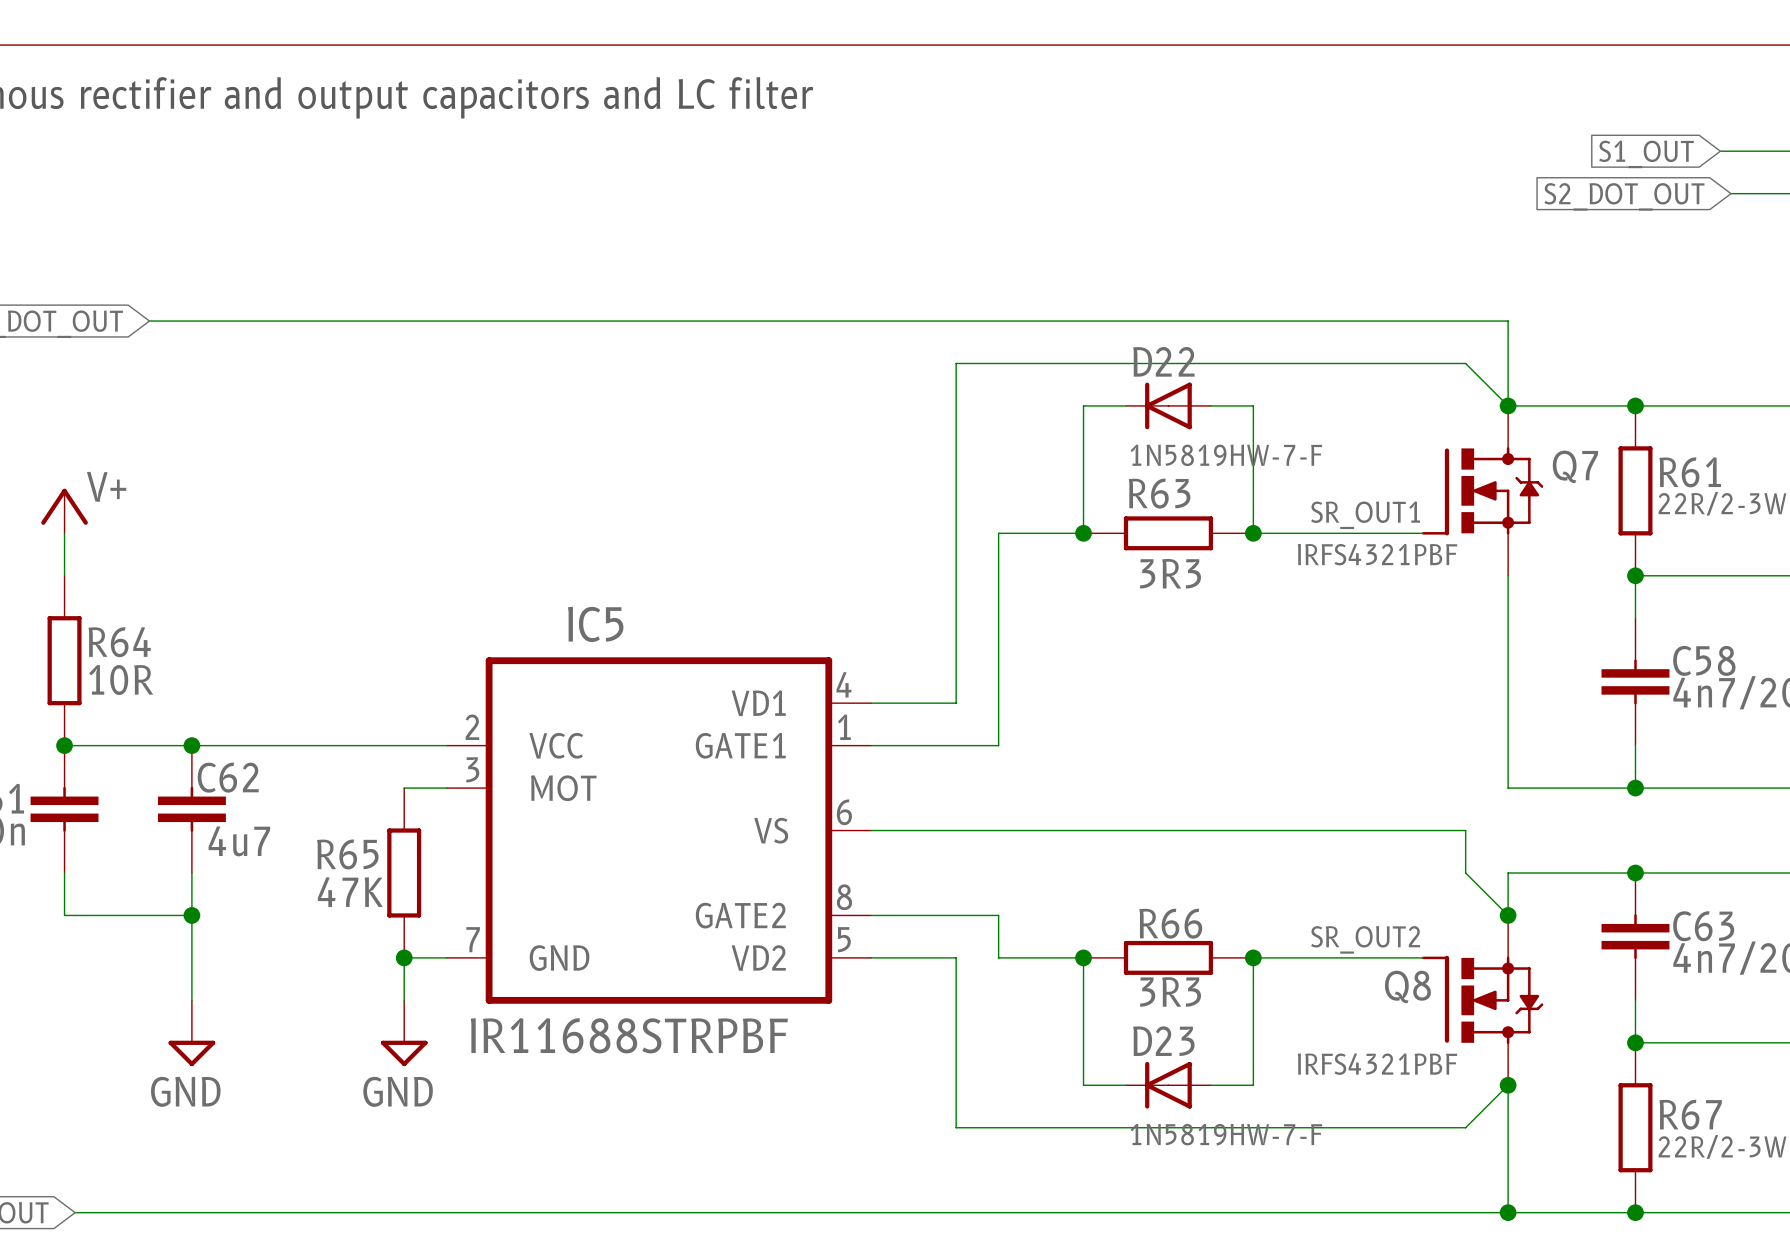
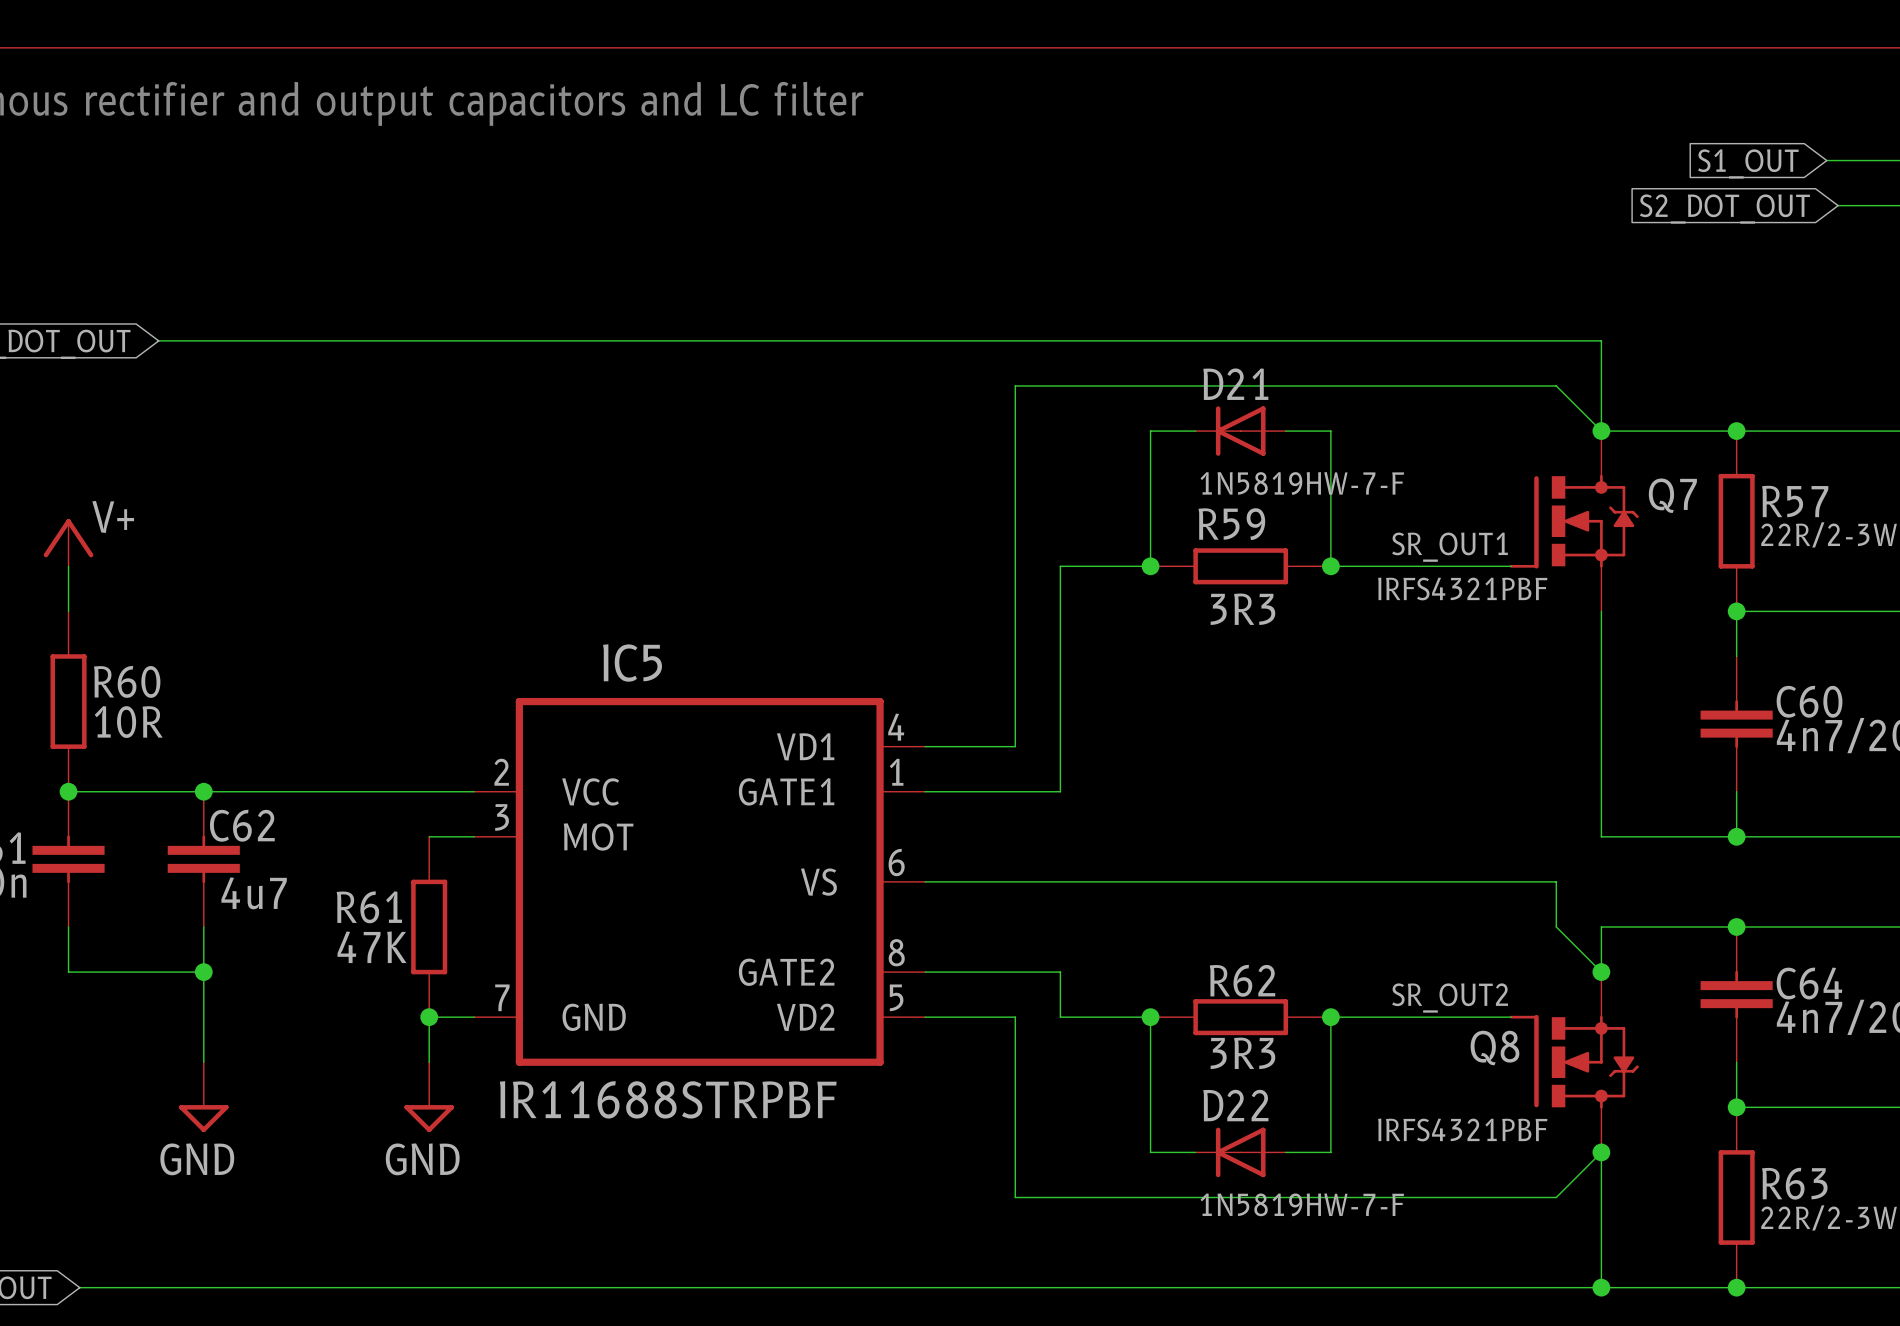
D22 name: D22 (1163, 361) -> D21 (1235, 384)
R61 name: R61 (1690, 472) -> R57 (1795, 501)
R63 name: R63 (1159, 493) -> R59 (1231, 524)
R64 name: R64 (119, 642) -> R60 (127, 681)
C58 name: C58 (1704, 660) -> C60 (1809, 701)
R65 name: R65 (347, 854) -> R61 (369, 907)
R66 name: R66 (1170, 923) -> R62 (1242, 980)
C63 name: C63 (1703, 926) -> C64 (1809, 983)
D23 name: D23 (1163, 1041) -> D22 (1235, 1105)
R67 name: R67 (1690, 1114) -> R63 (1794, 1183)

